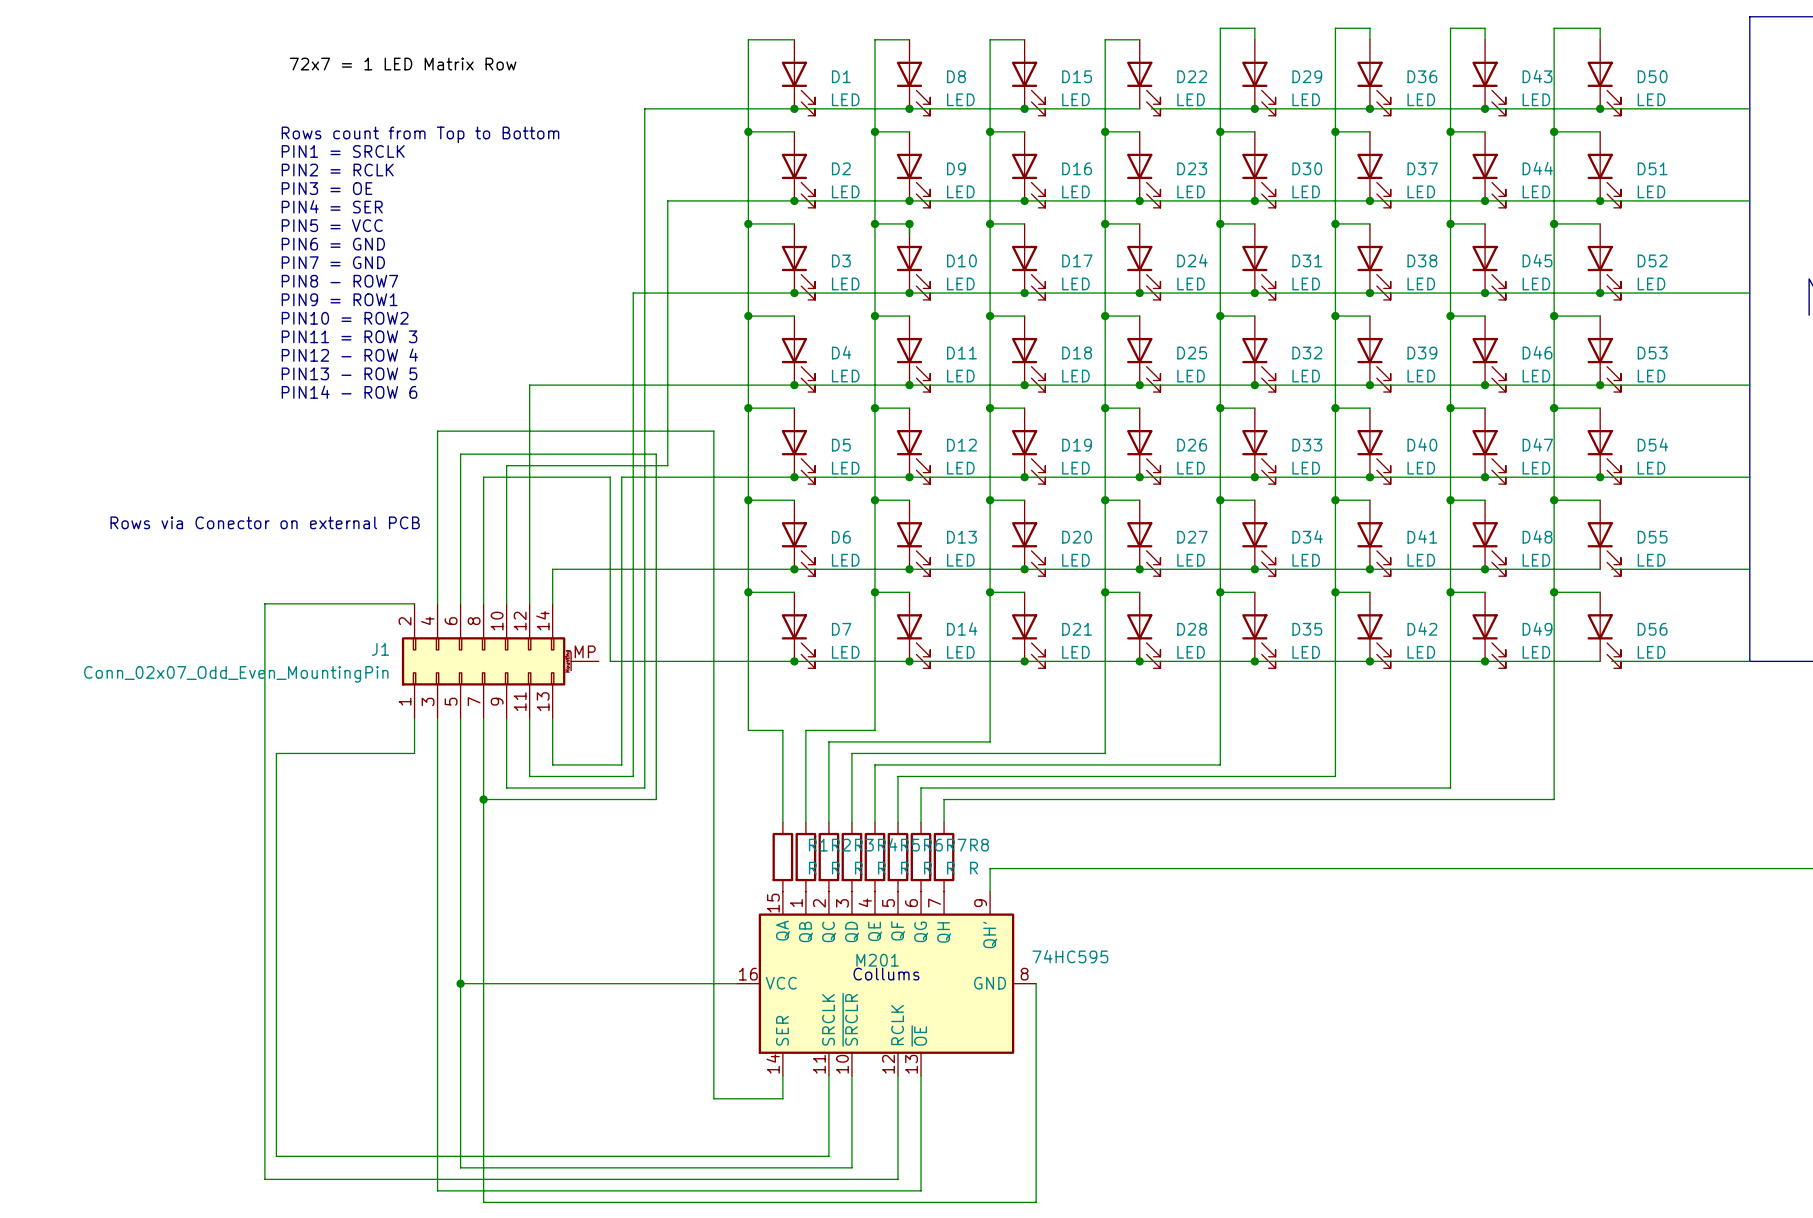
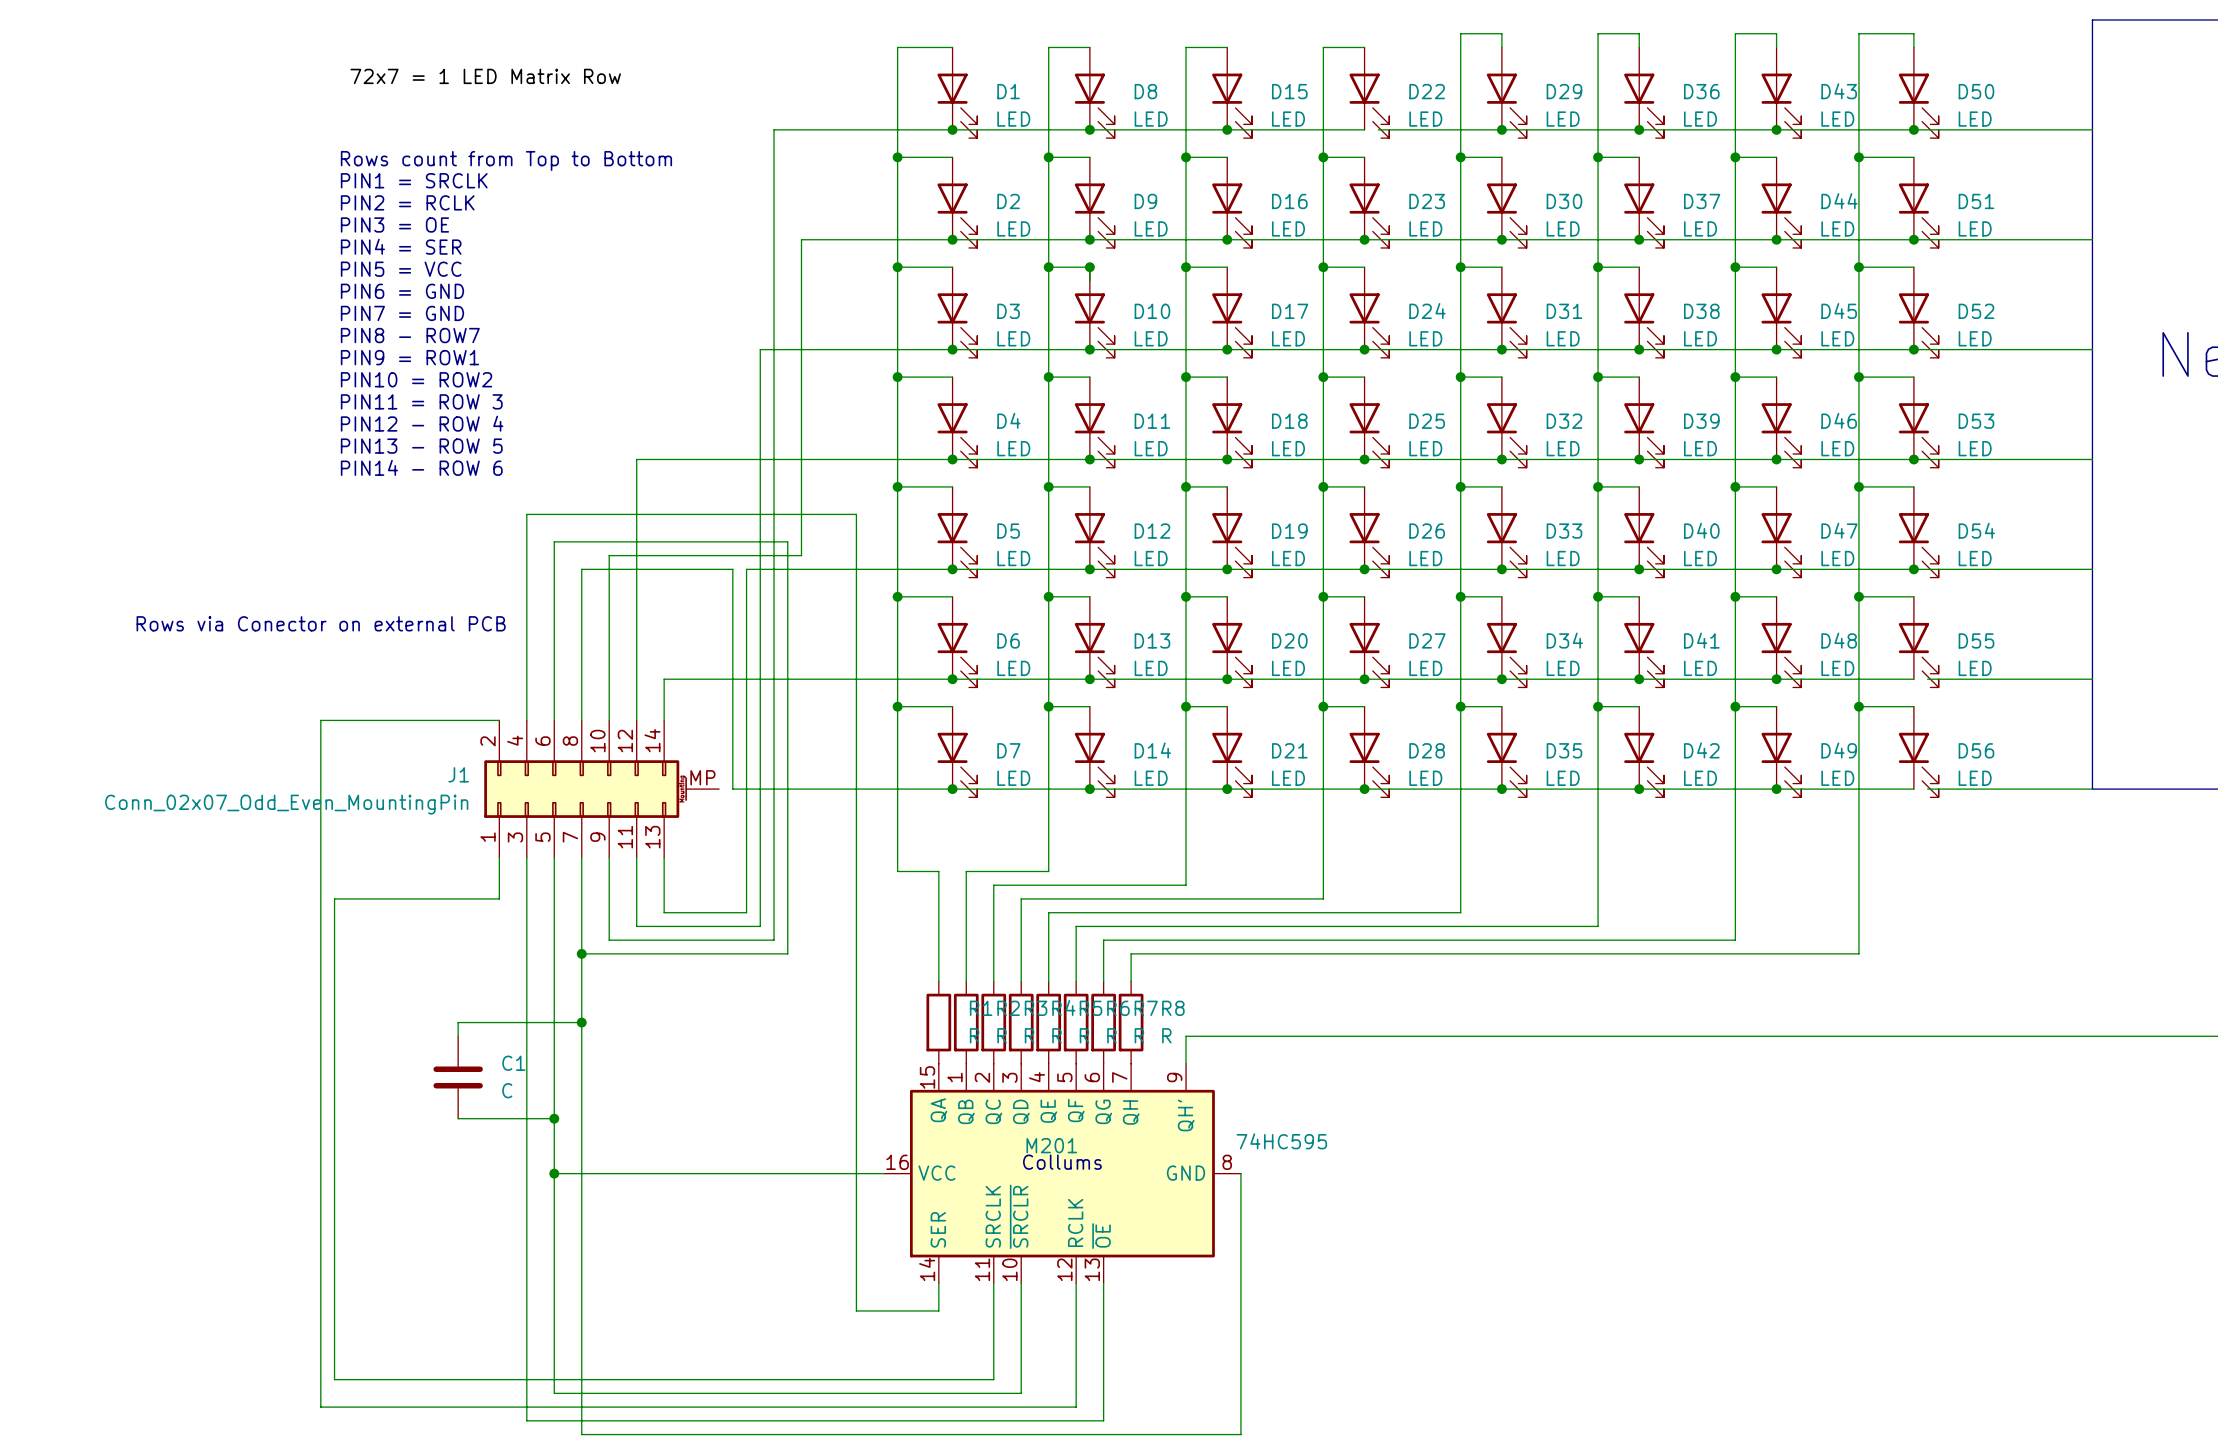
wire: none -> (581, 1022) (458, 1022) (458, 1036)
junction: none -> (581, 1022)
C1: none -> C (458, 1077)
wire: none -> (458, 1118) (554, 1118)
junction: none -> (554, 1118)

